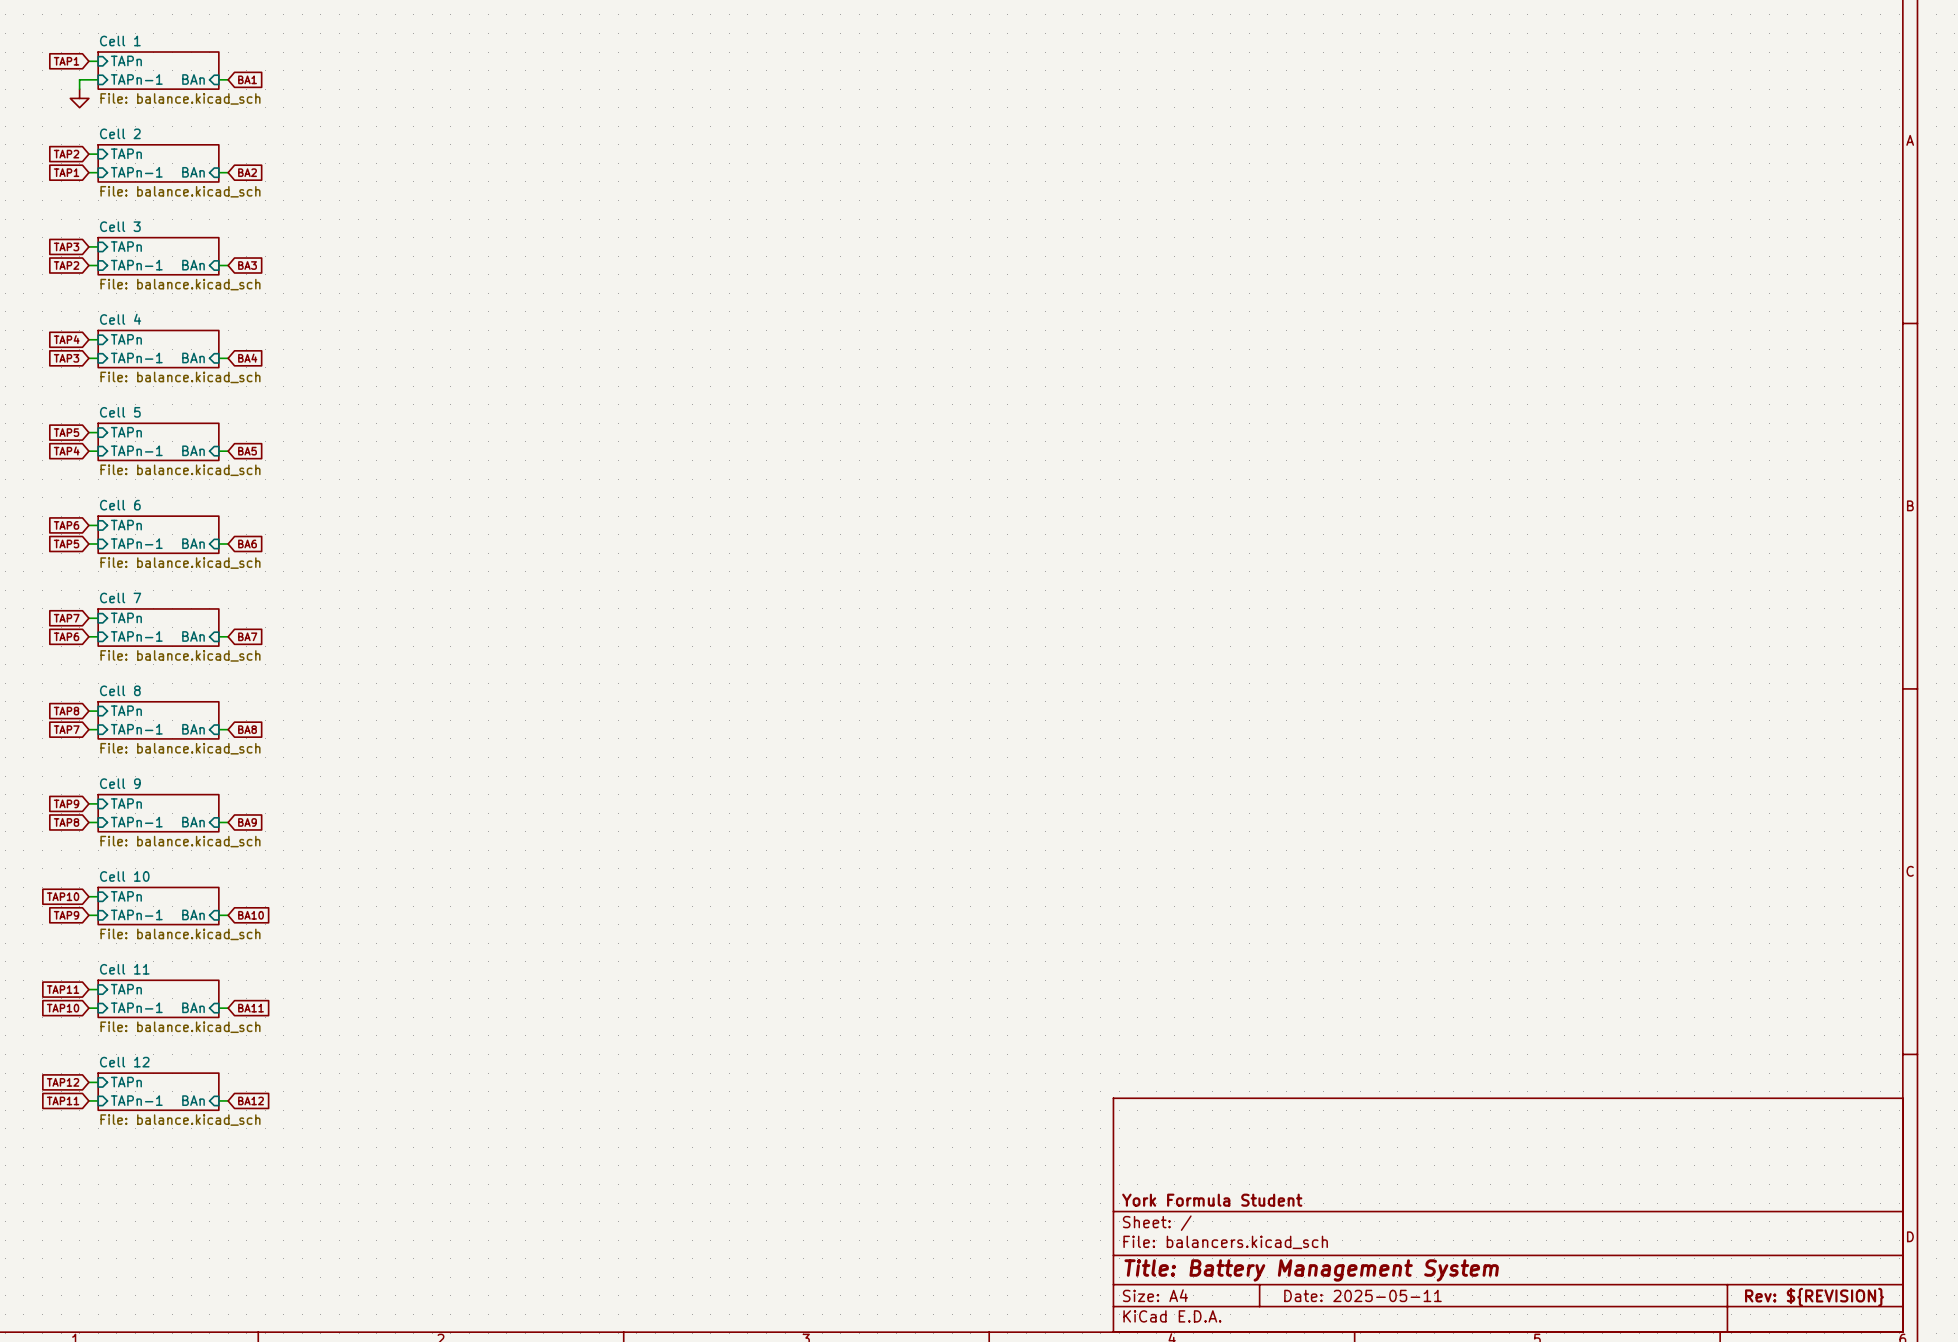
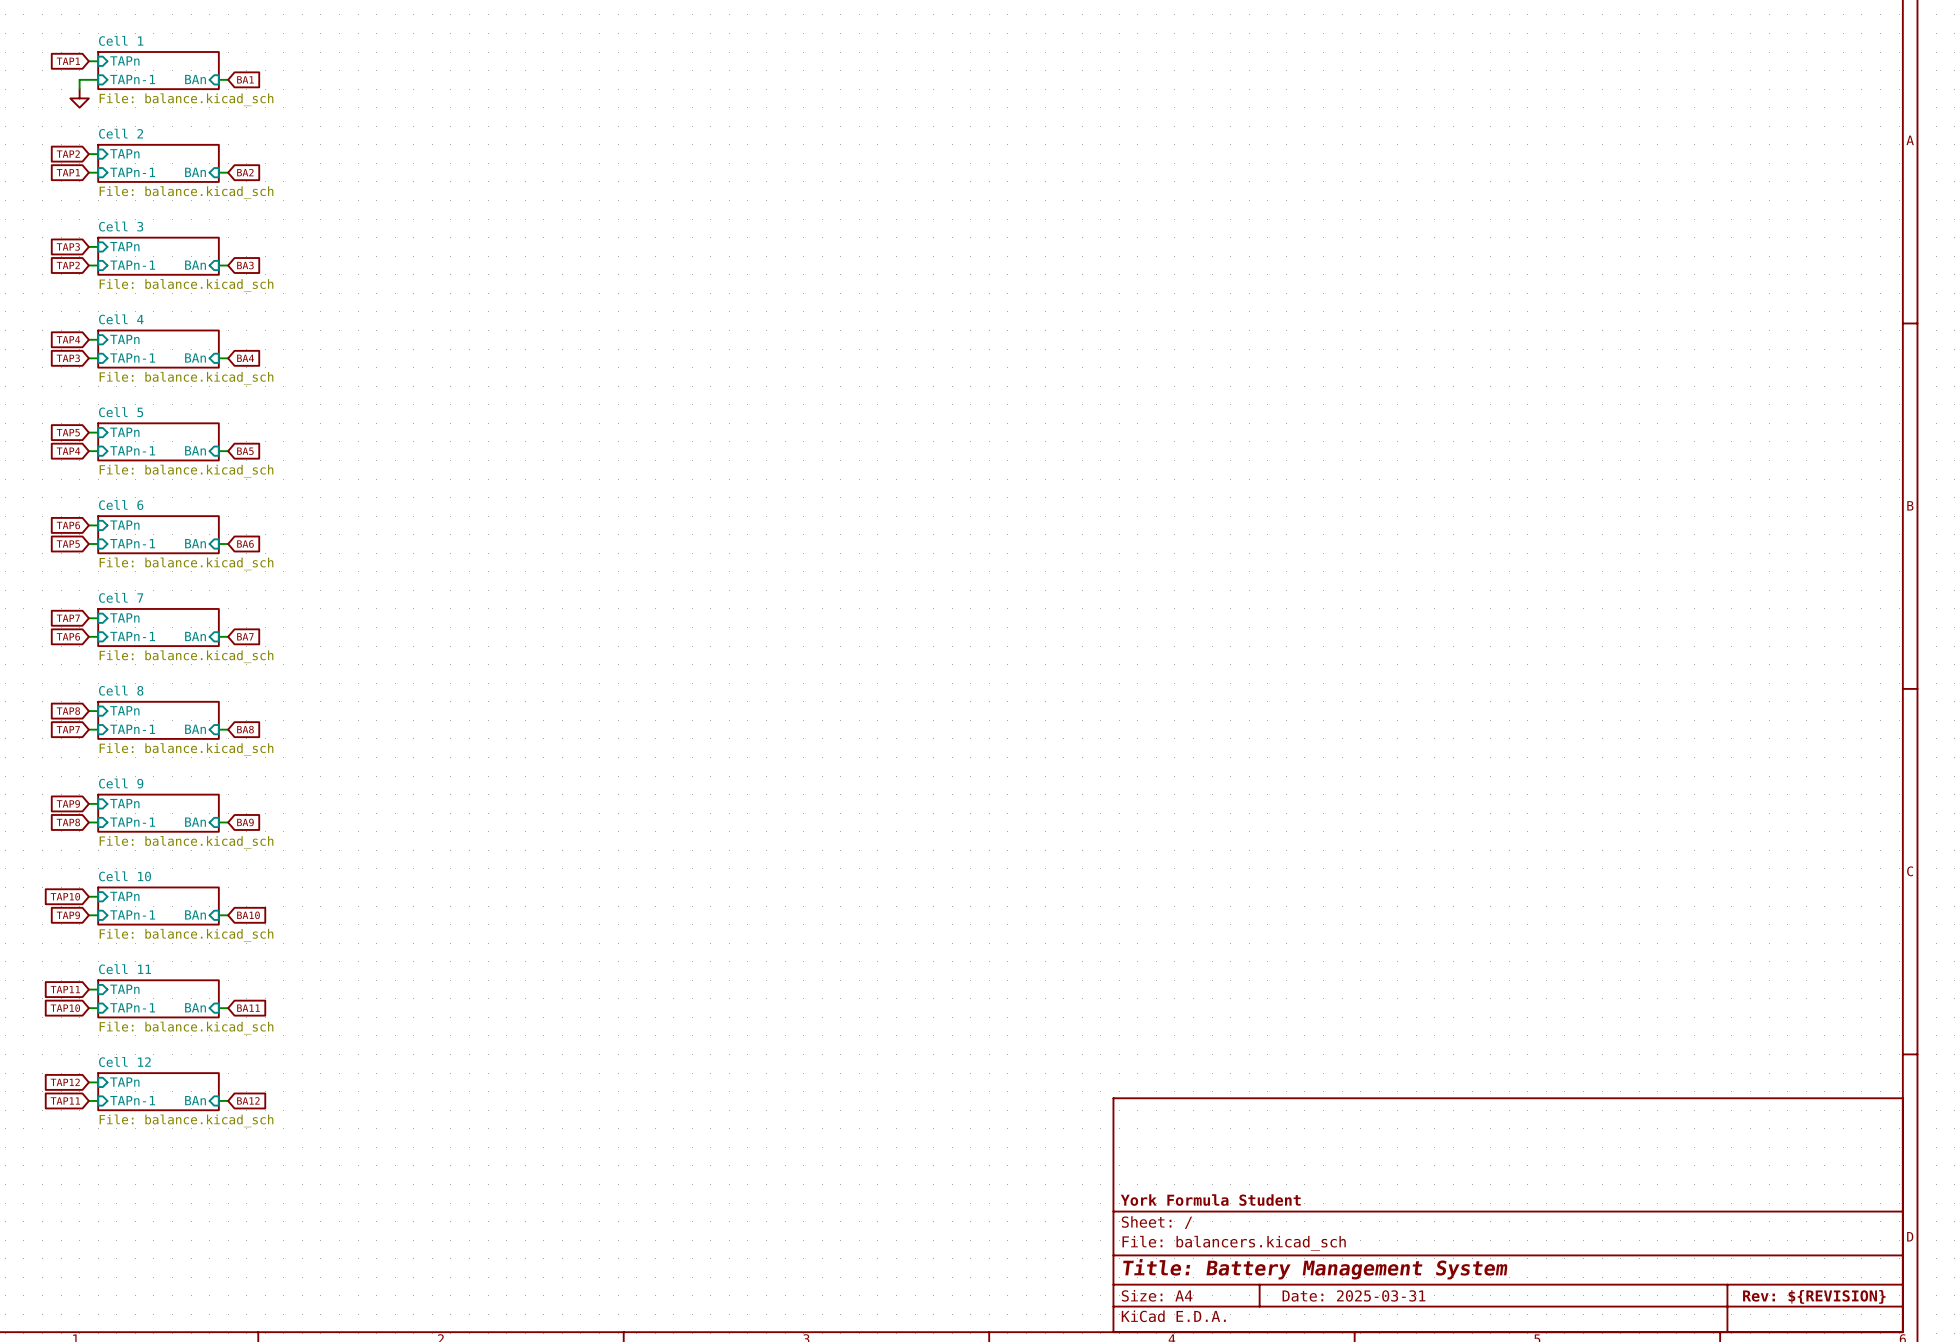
title block: Date: 2025-05-11 (1362, 1295) -> Date: 2025-03-31 (1353, 1295)

